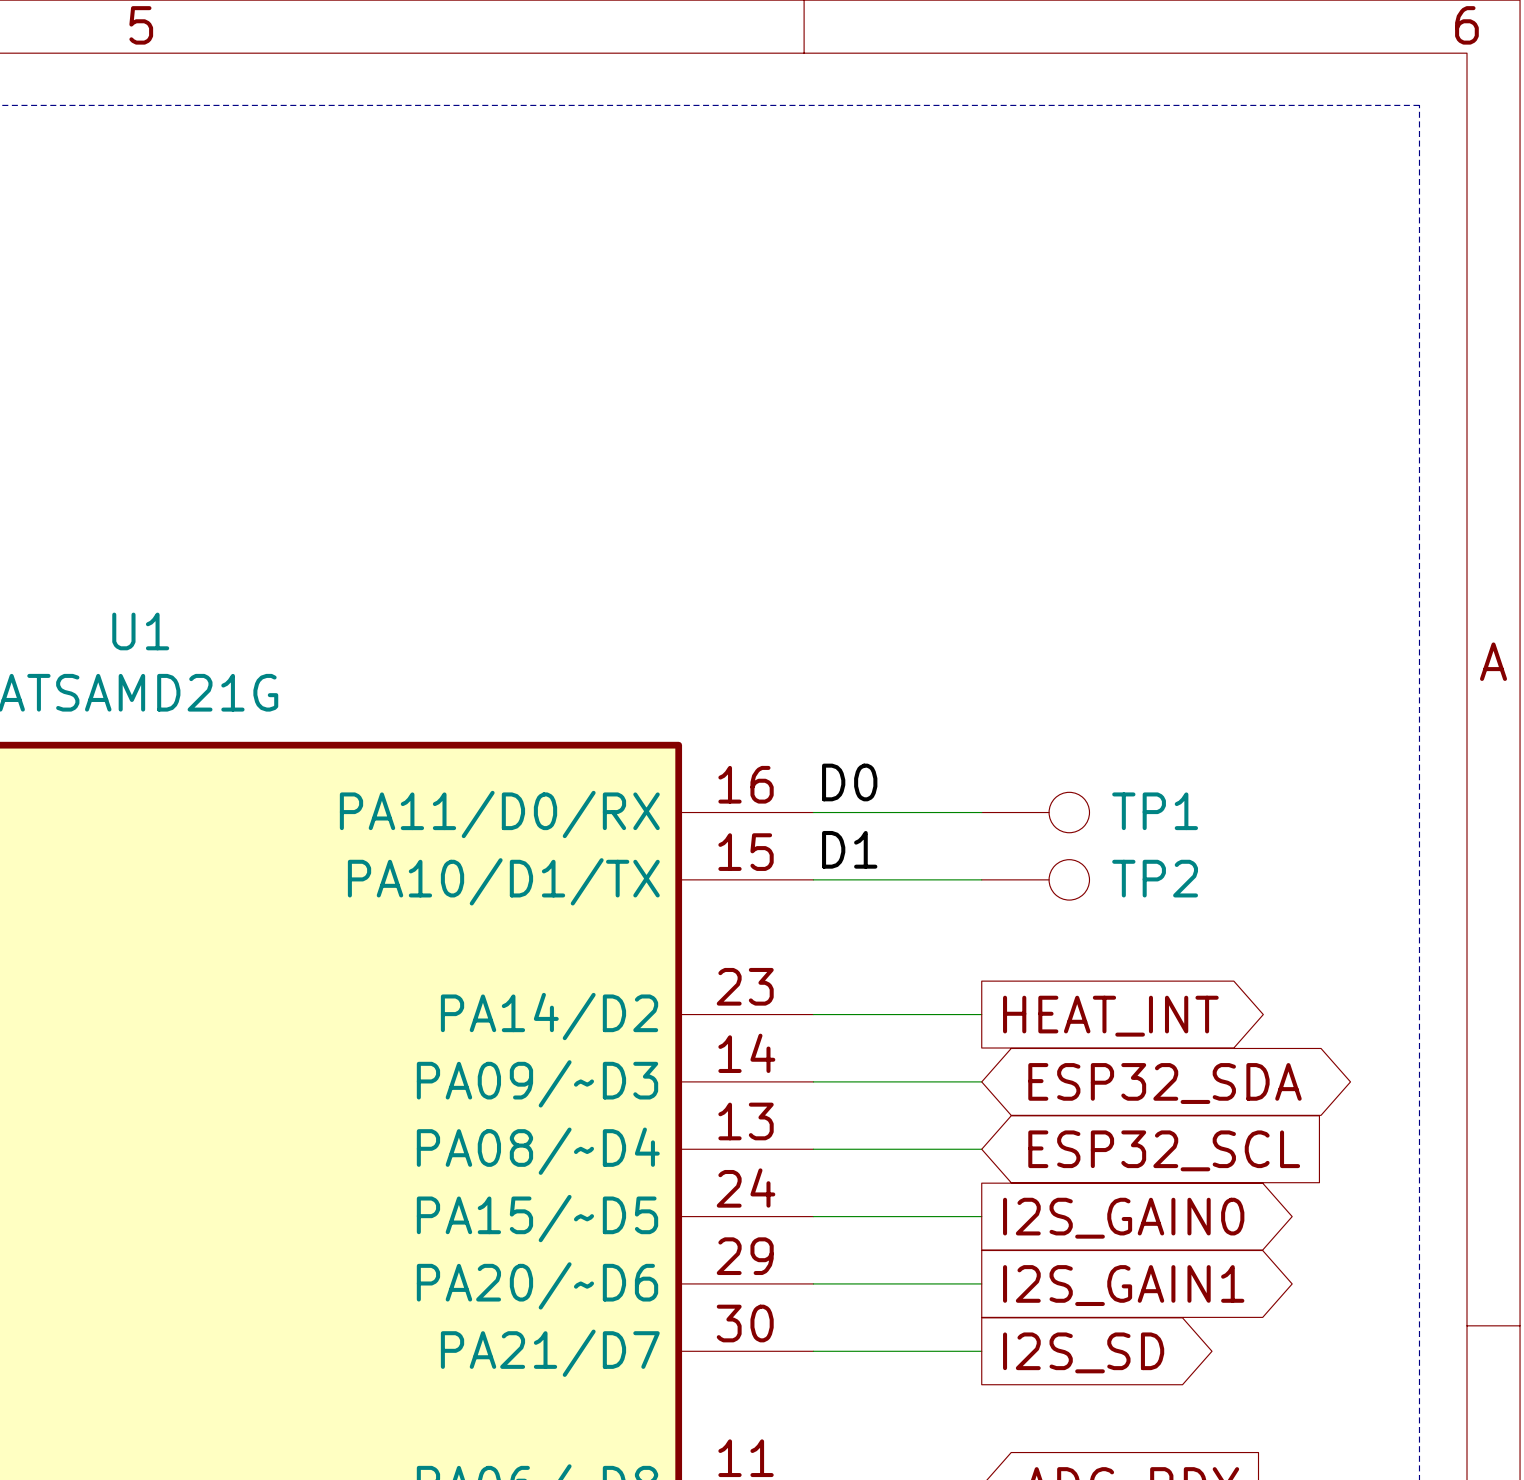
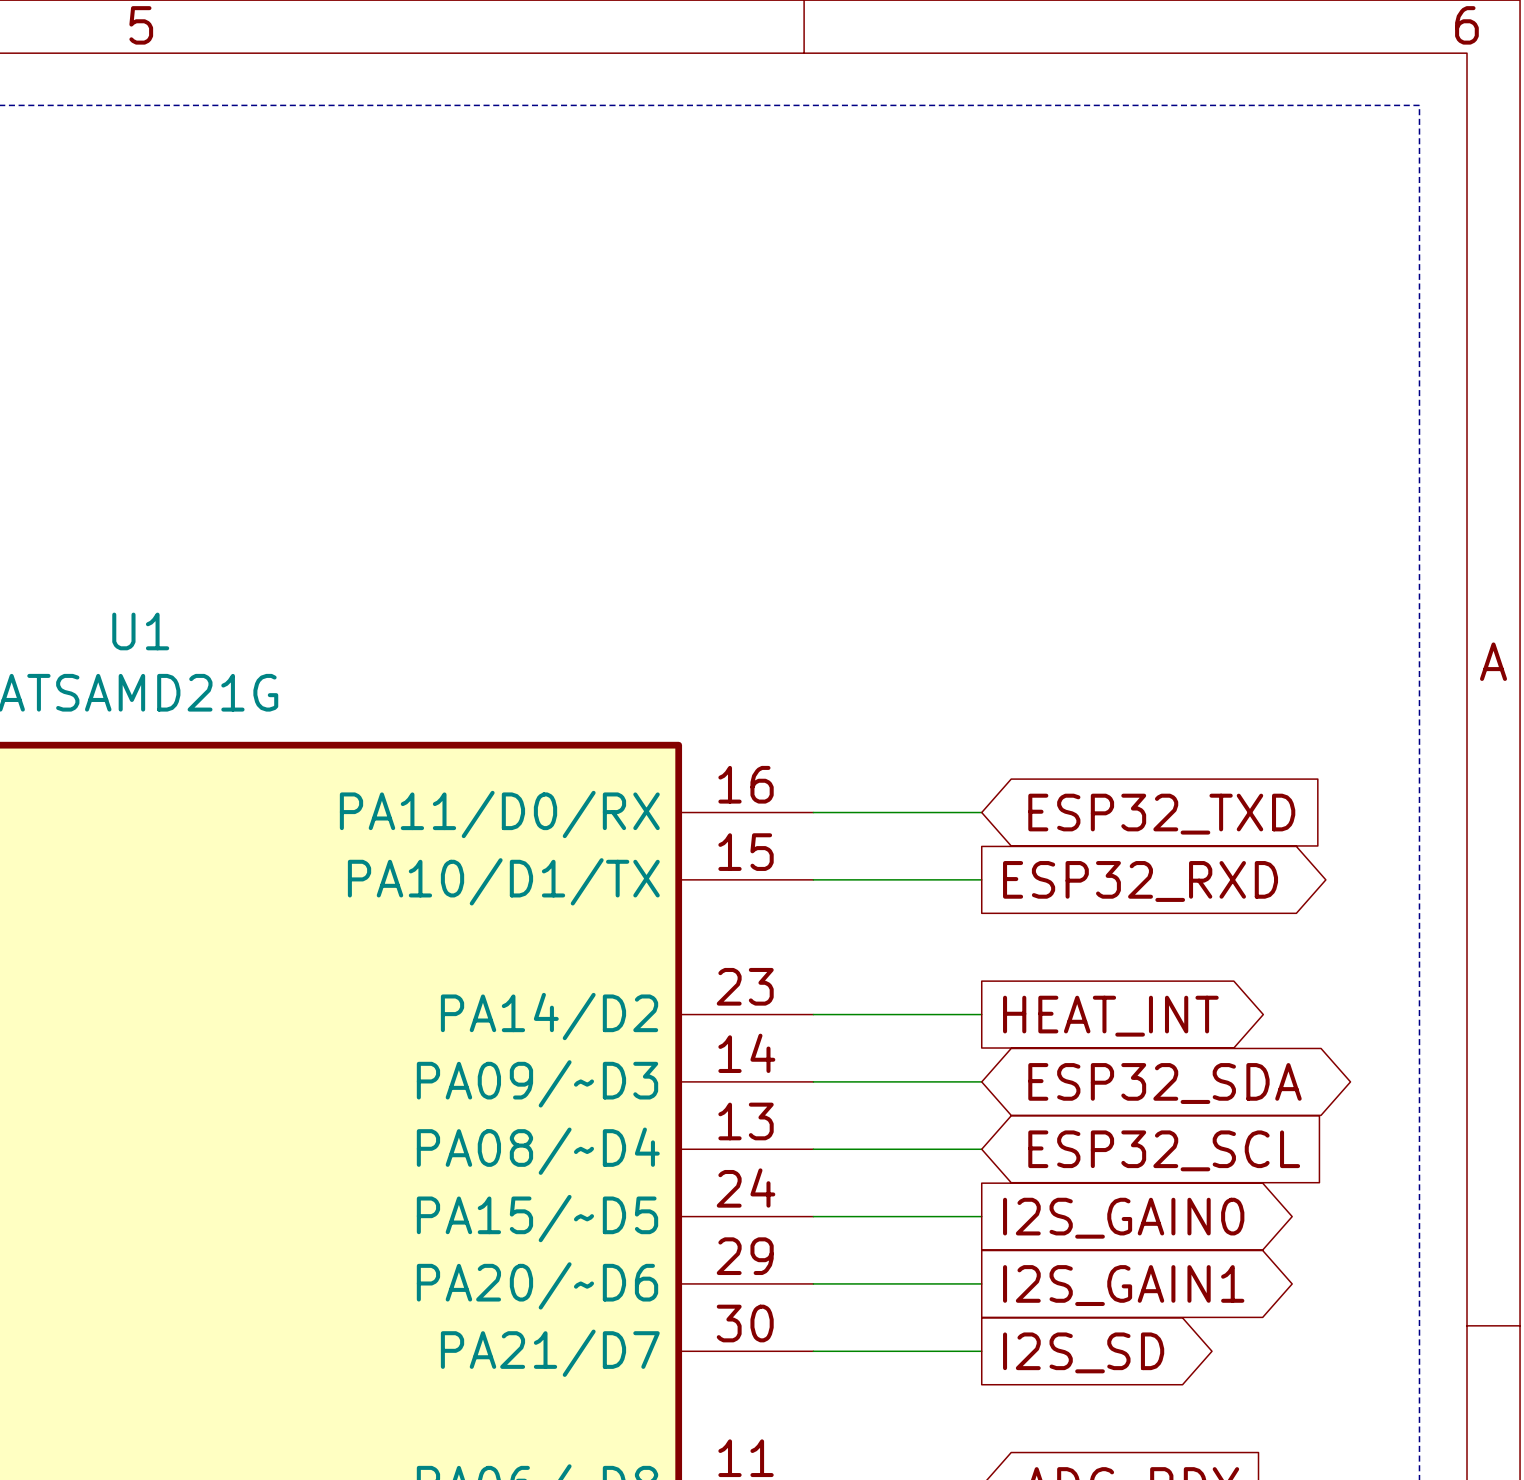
label: D0 (849, 782) -> none
TP1: (1035, 812) -> none
global label: none -> ESP32_TXD (1161, 814)
label: D1 (849, 849) -> none
TP2: (1035, 879) -> none
global label: none -> ESP32_RXD (1140, 881)

